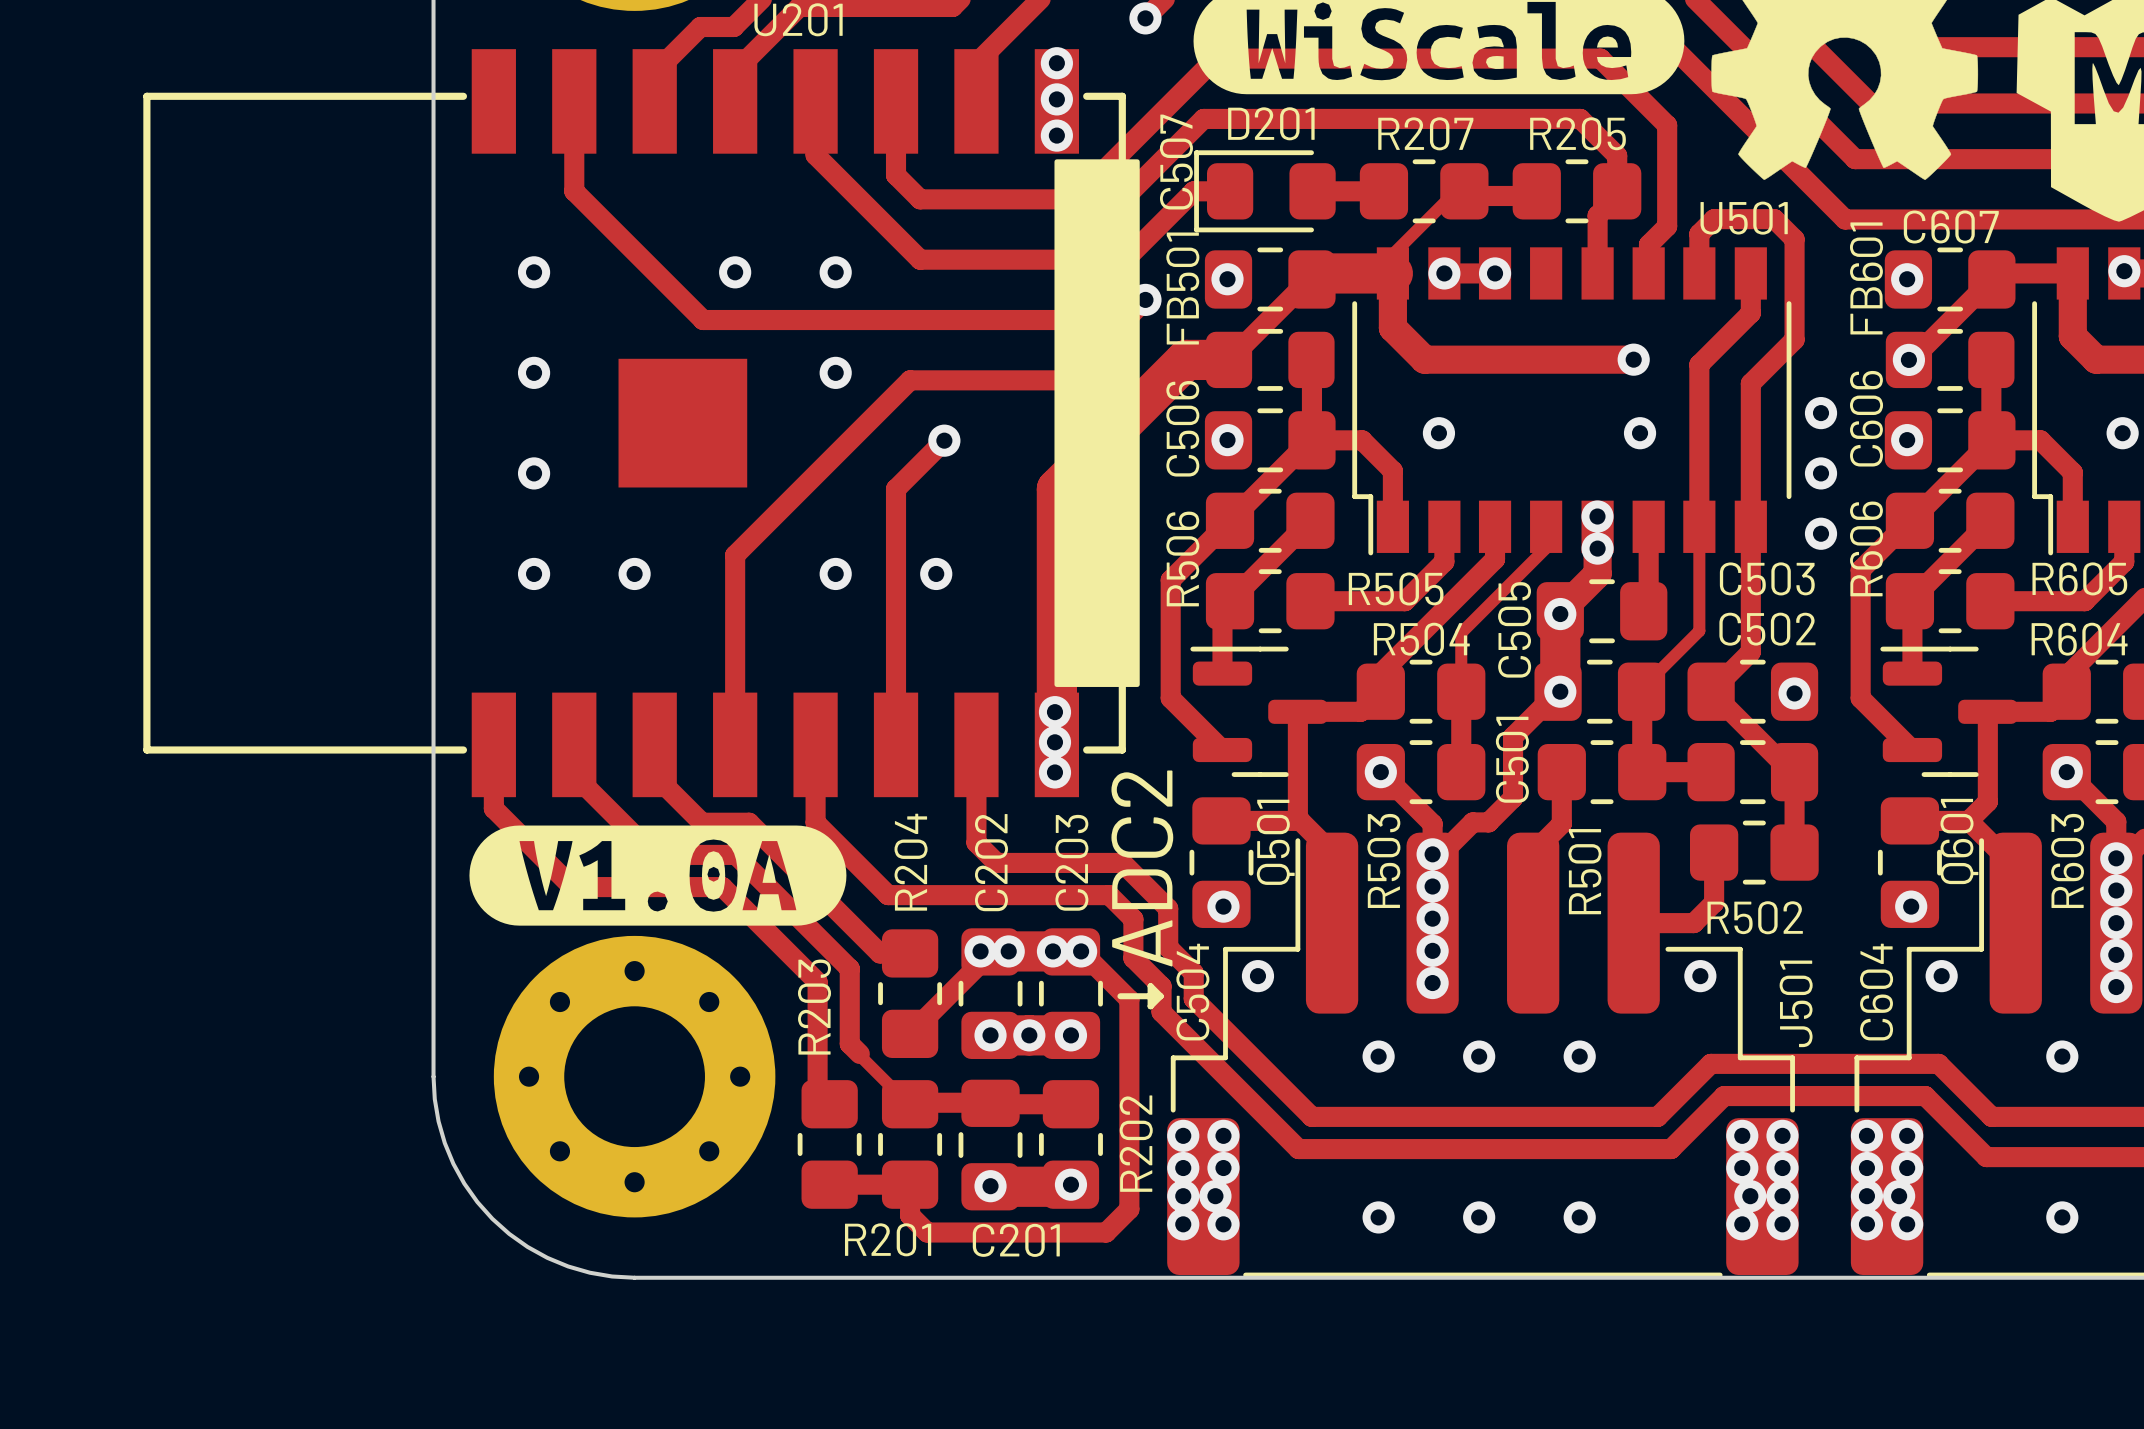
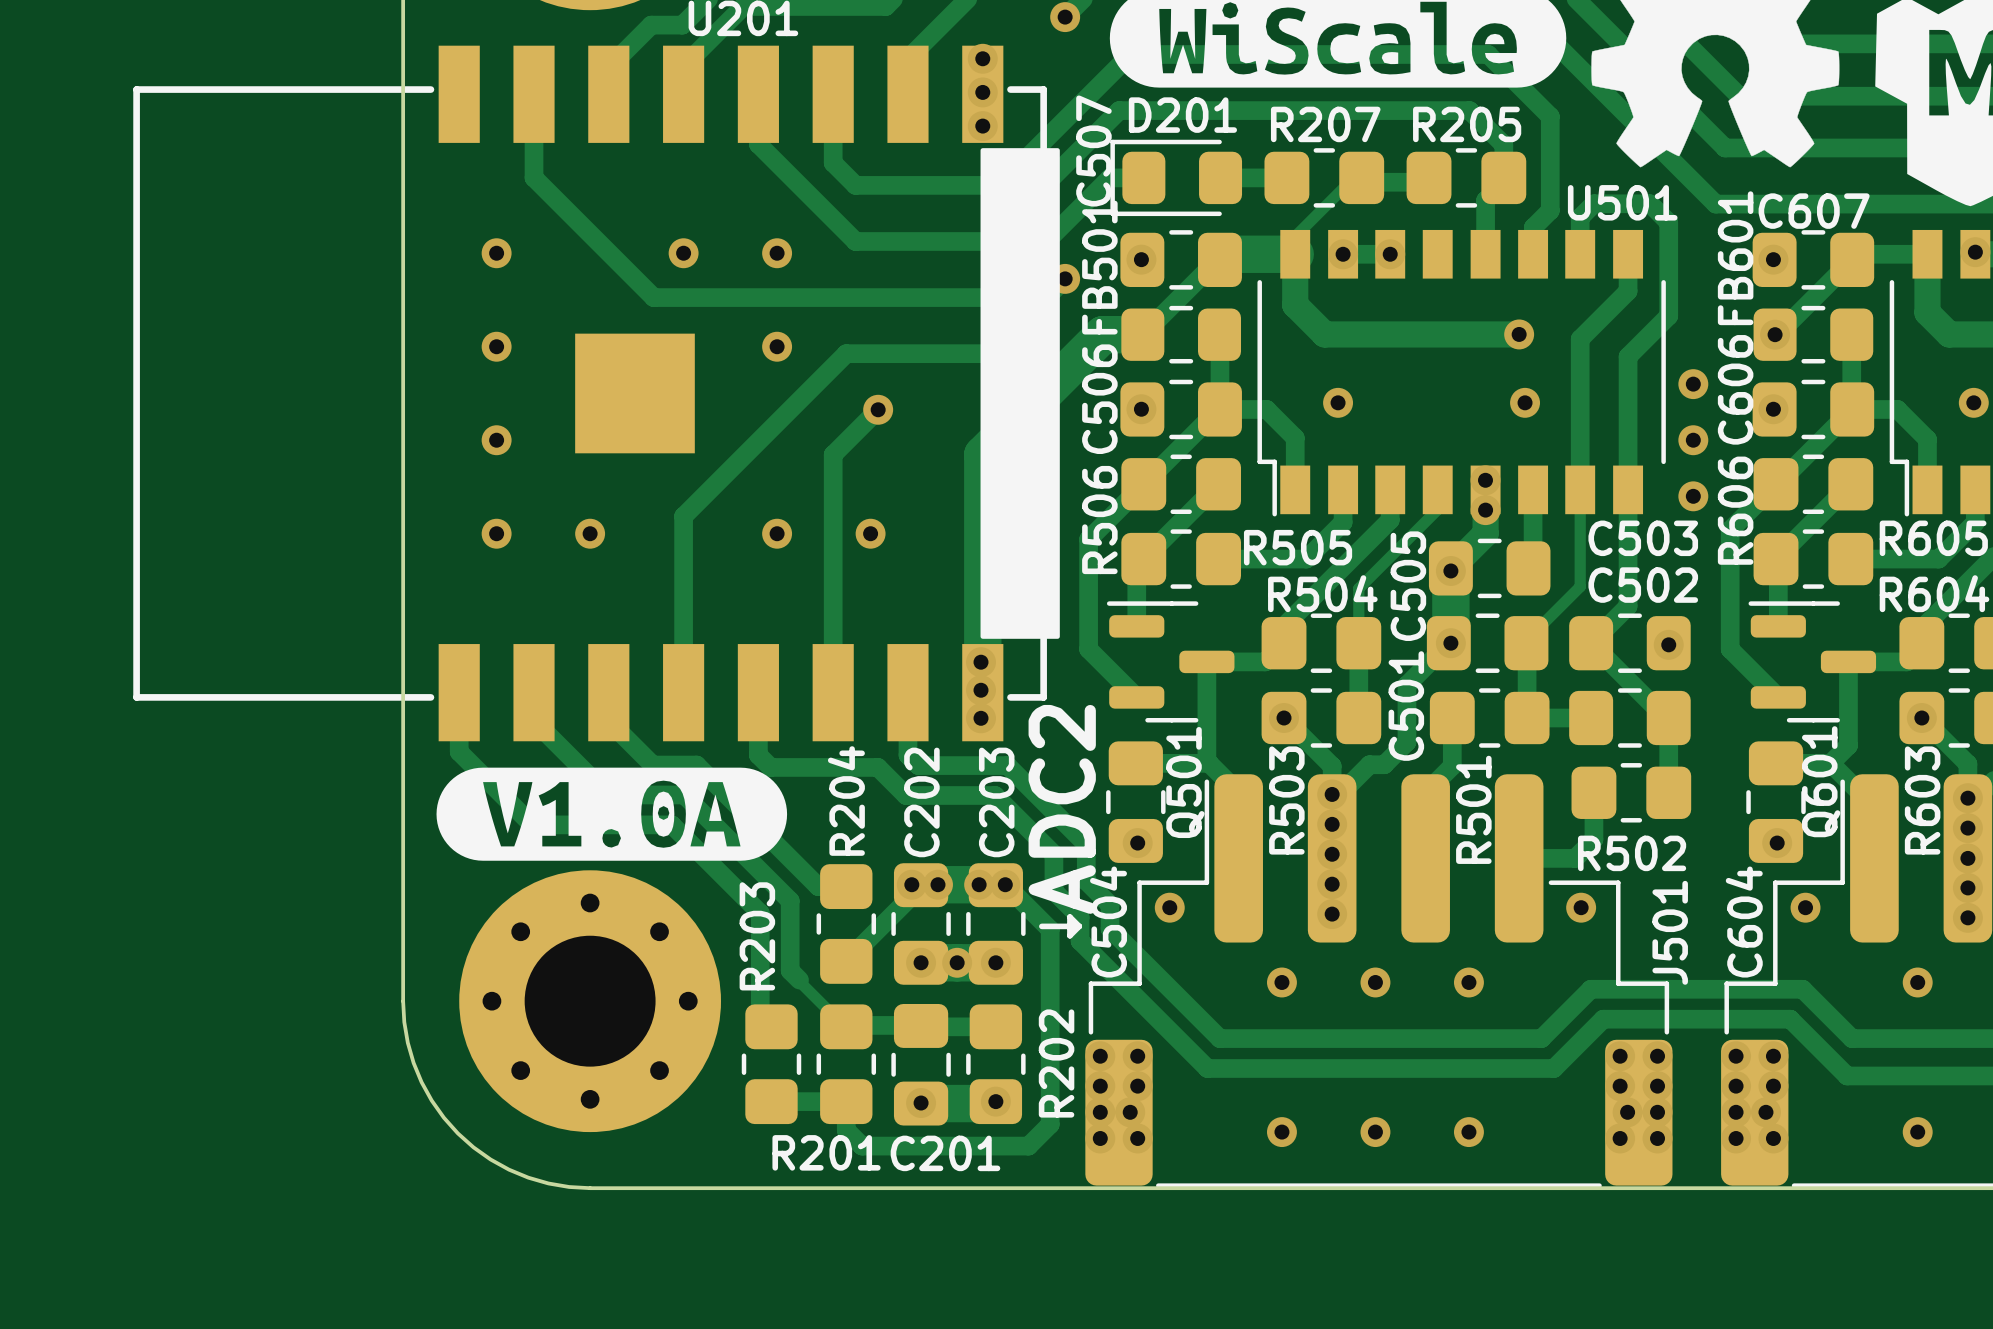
track: (815, 812) (815, 822) (888, 895) (1109, 895) (1133, 919) -> (758, 755) (770, 767) (878, 767) (906, 795) (995, 795) (1053, 854)
track: (976, 812) (976, 842) (996, 862) (1122, 862) (1168, 908) -> (907, 755) (918, 765) (1007, 765) (1086, 844)

